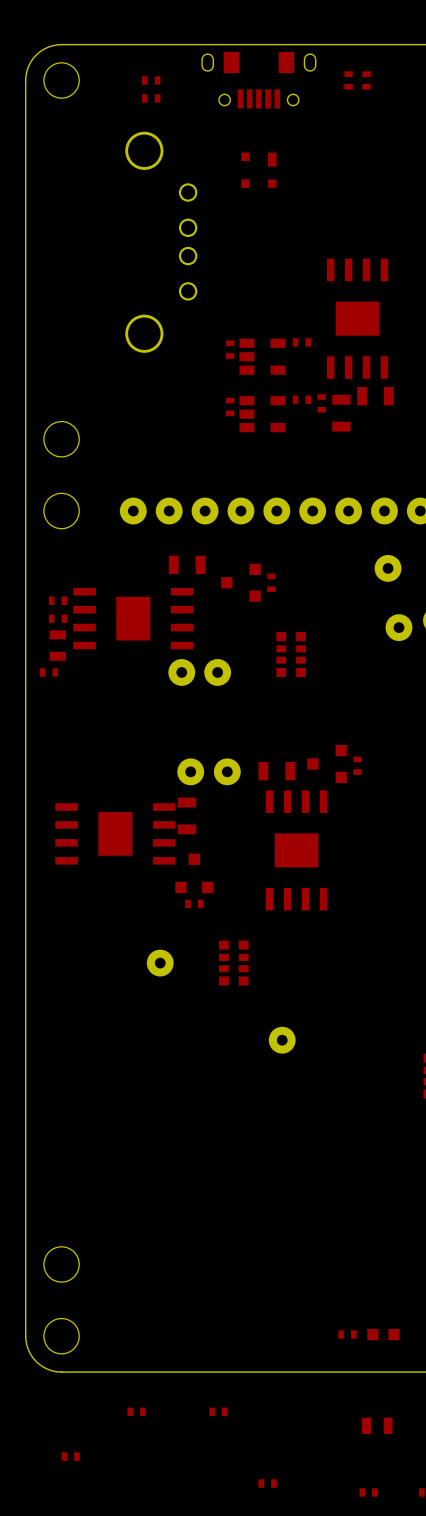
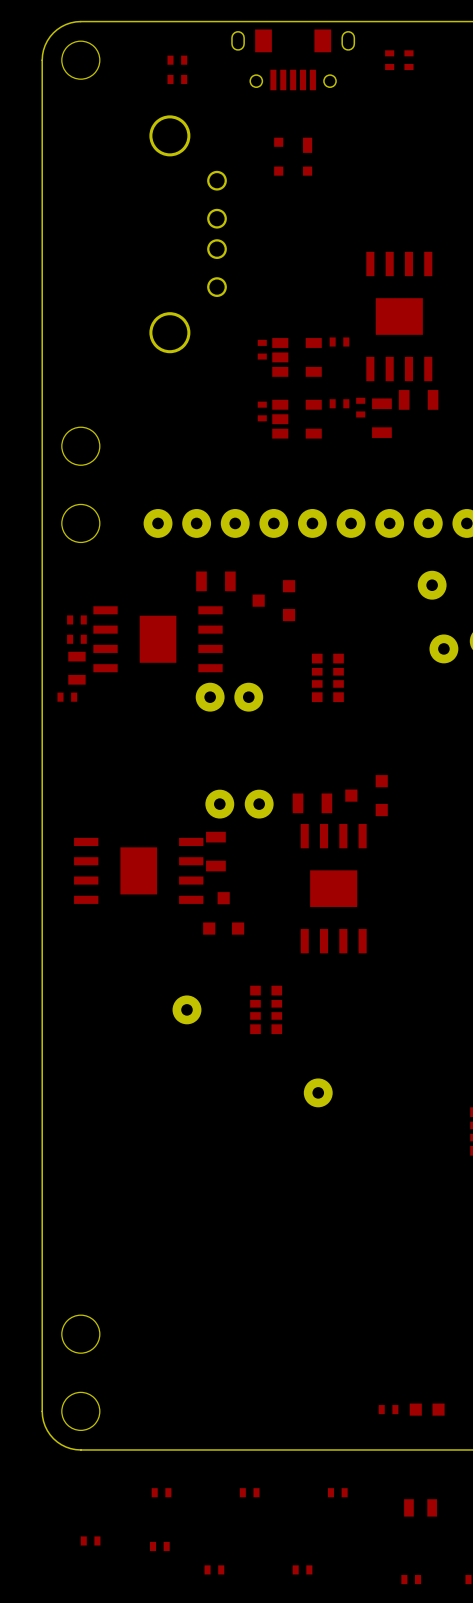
part: (271, 582) -> none
part: (357, 765) -> none
part: (194, 903) -> none
part: none -> (337, 1492)
part: none -> (159, 1546)
part: none -> (214, 1569)

